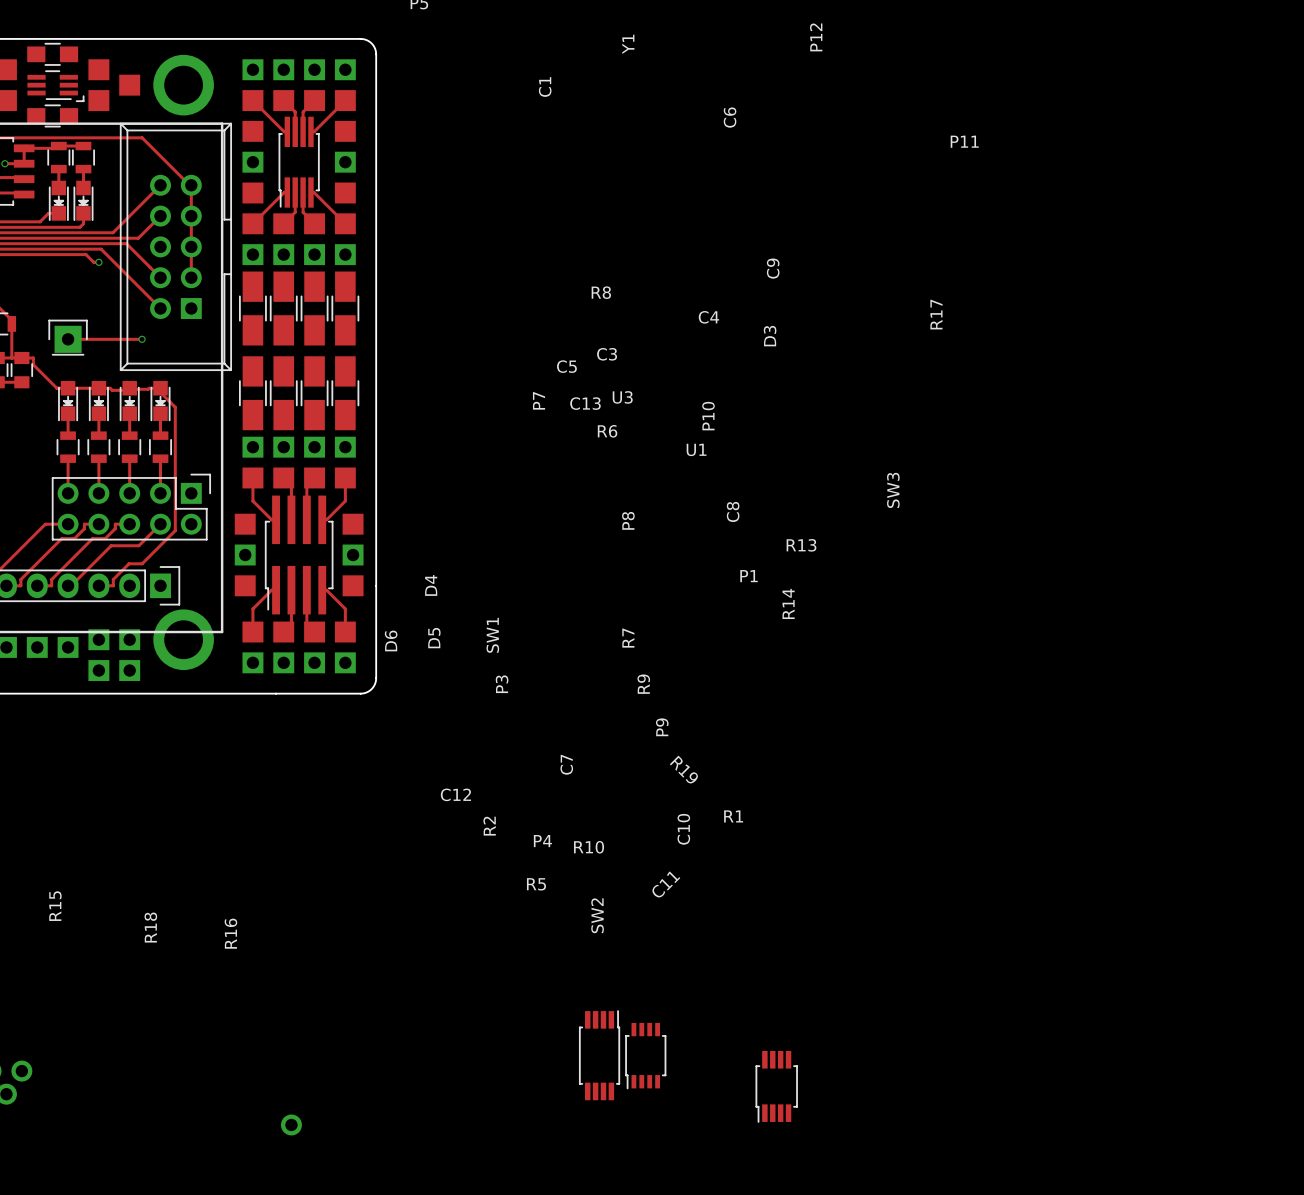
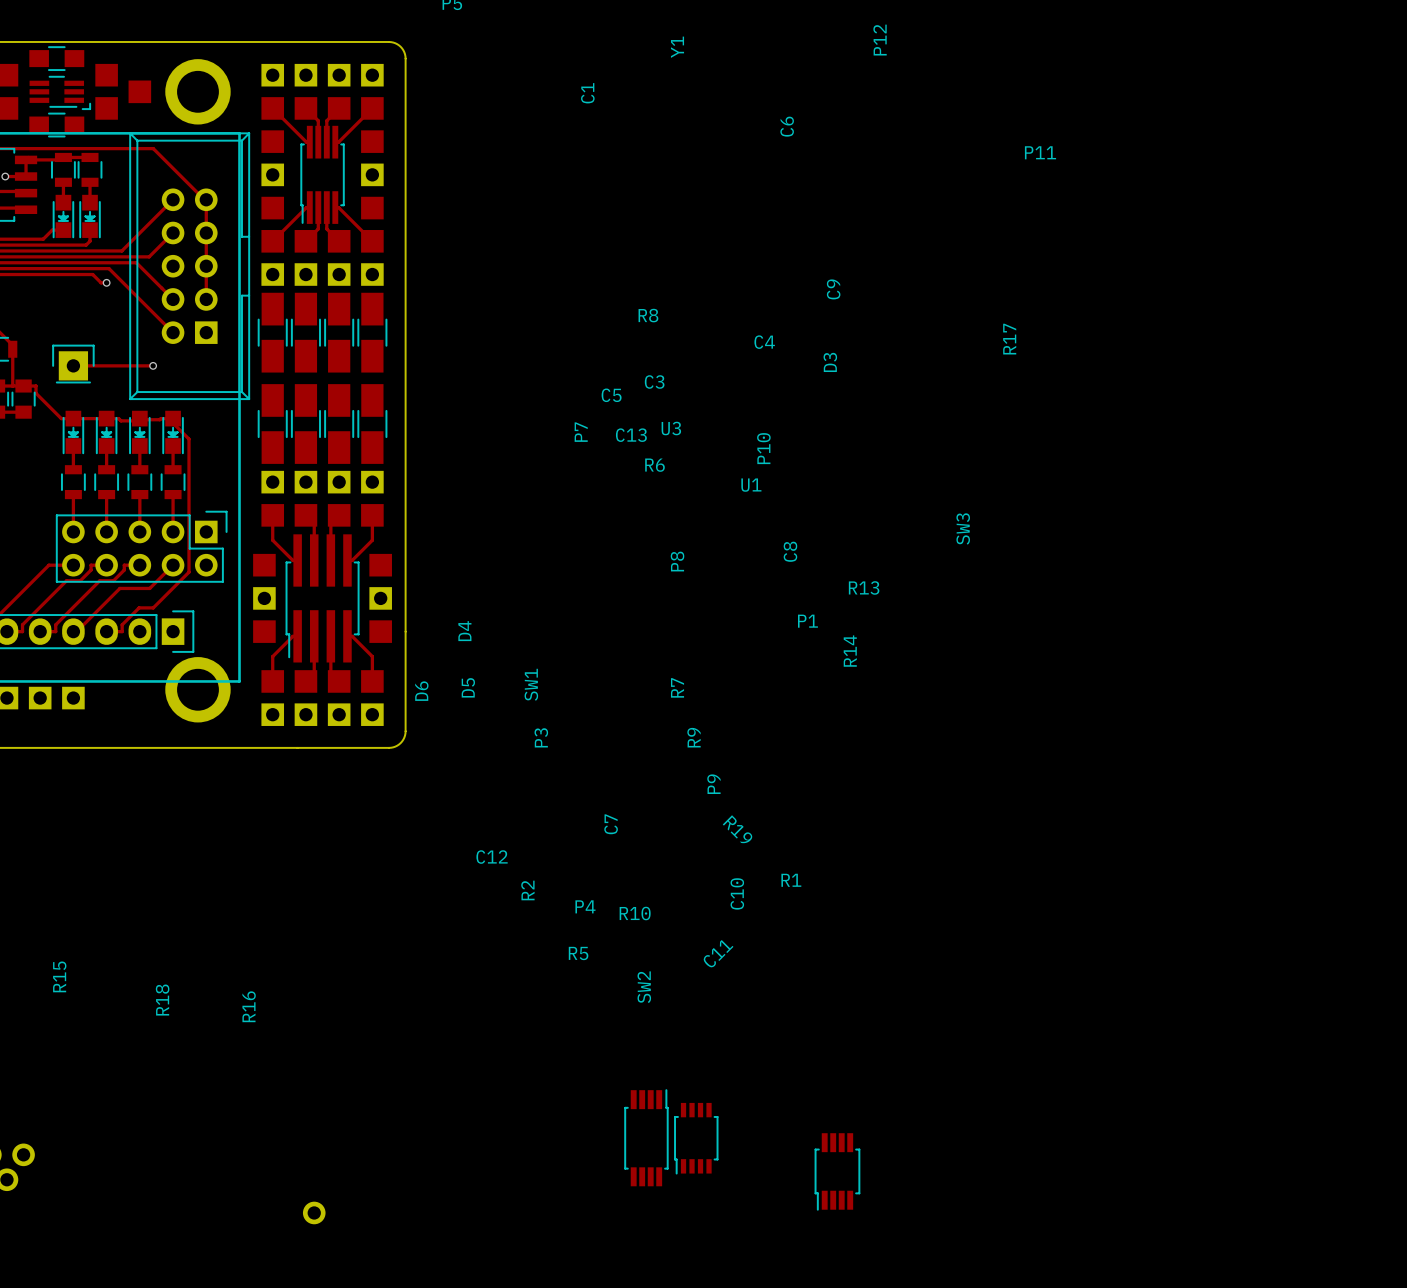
part: (98, 639) -> none
part: (129, 639) -> none
part: (98, 670) -> none
part: (129, 670) -> none

